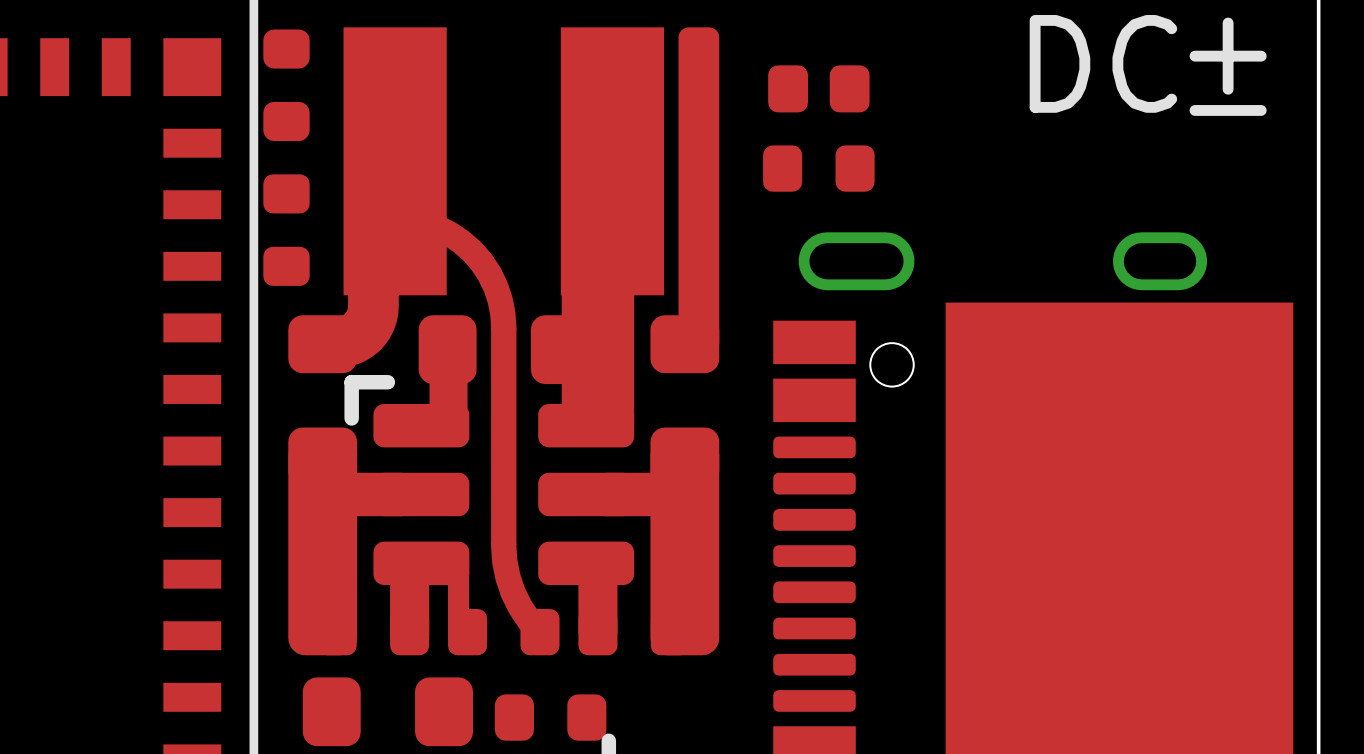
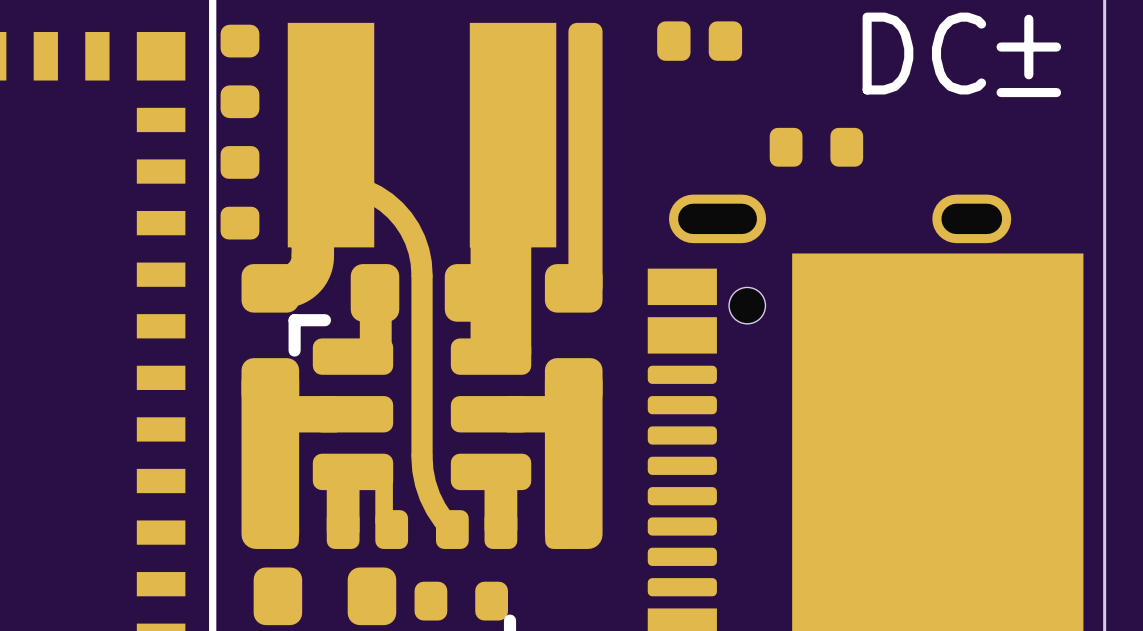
part position: (818, 88) -> (699, 41)
part position: (818, 168) -> (816, 147)

